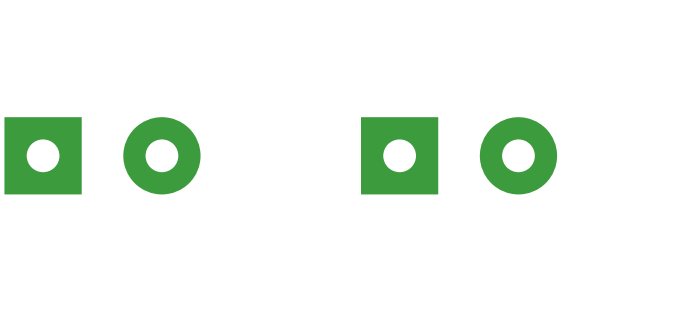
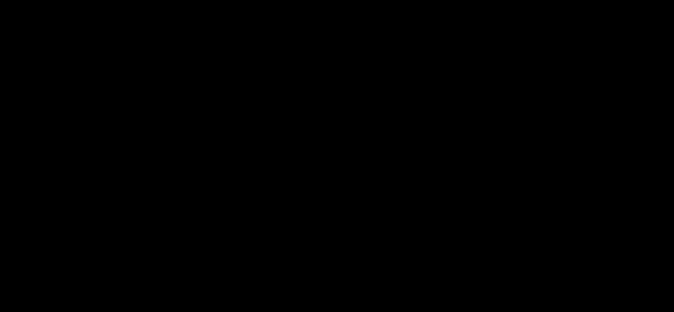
part: (102, 155) -> none
part: (459, 155) -> none

